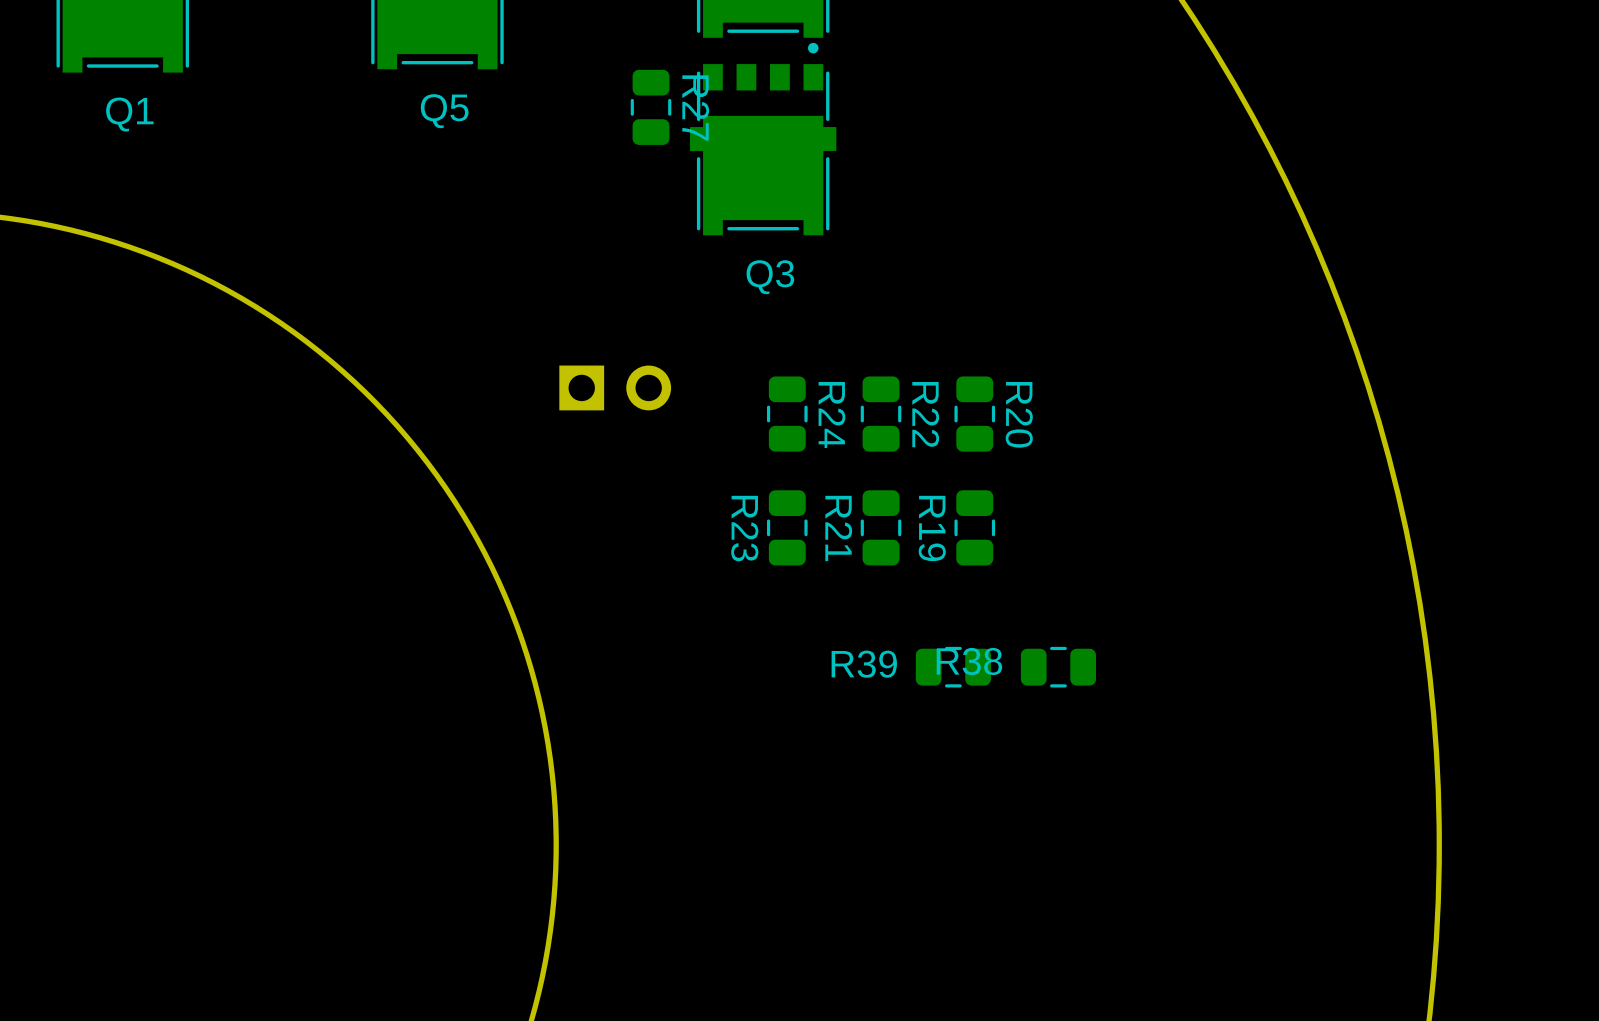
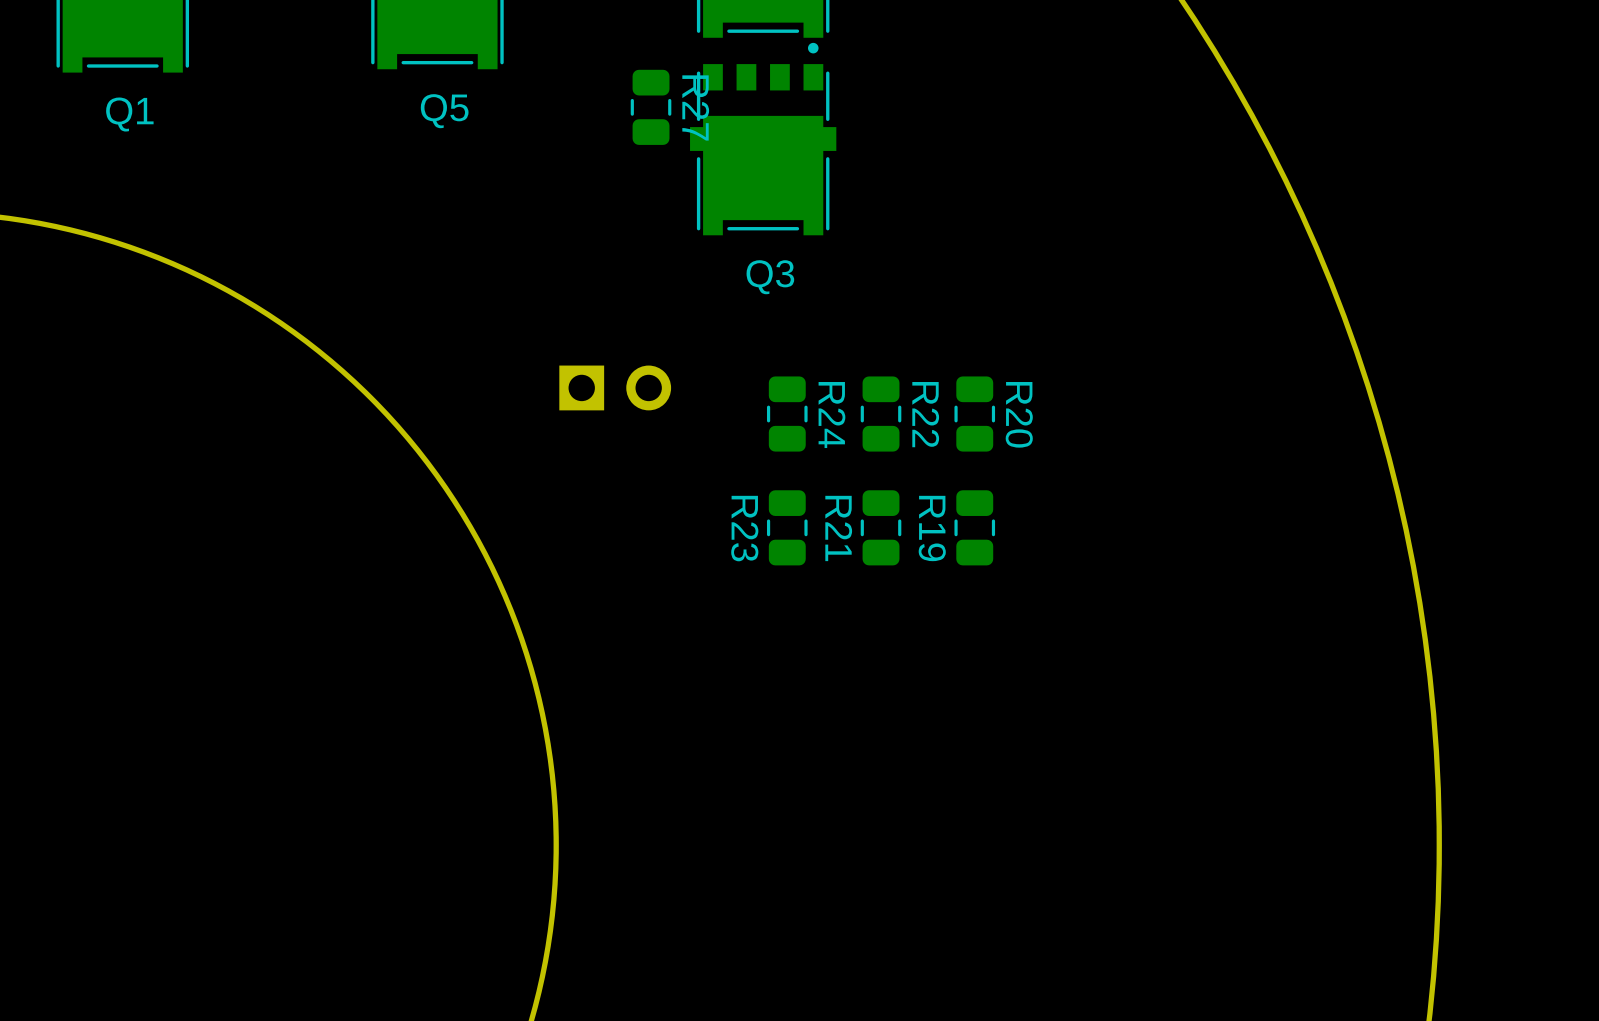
R39: (953, 667) -> none
R38: (1058, 667) -> none

